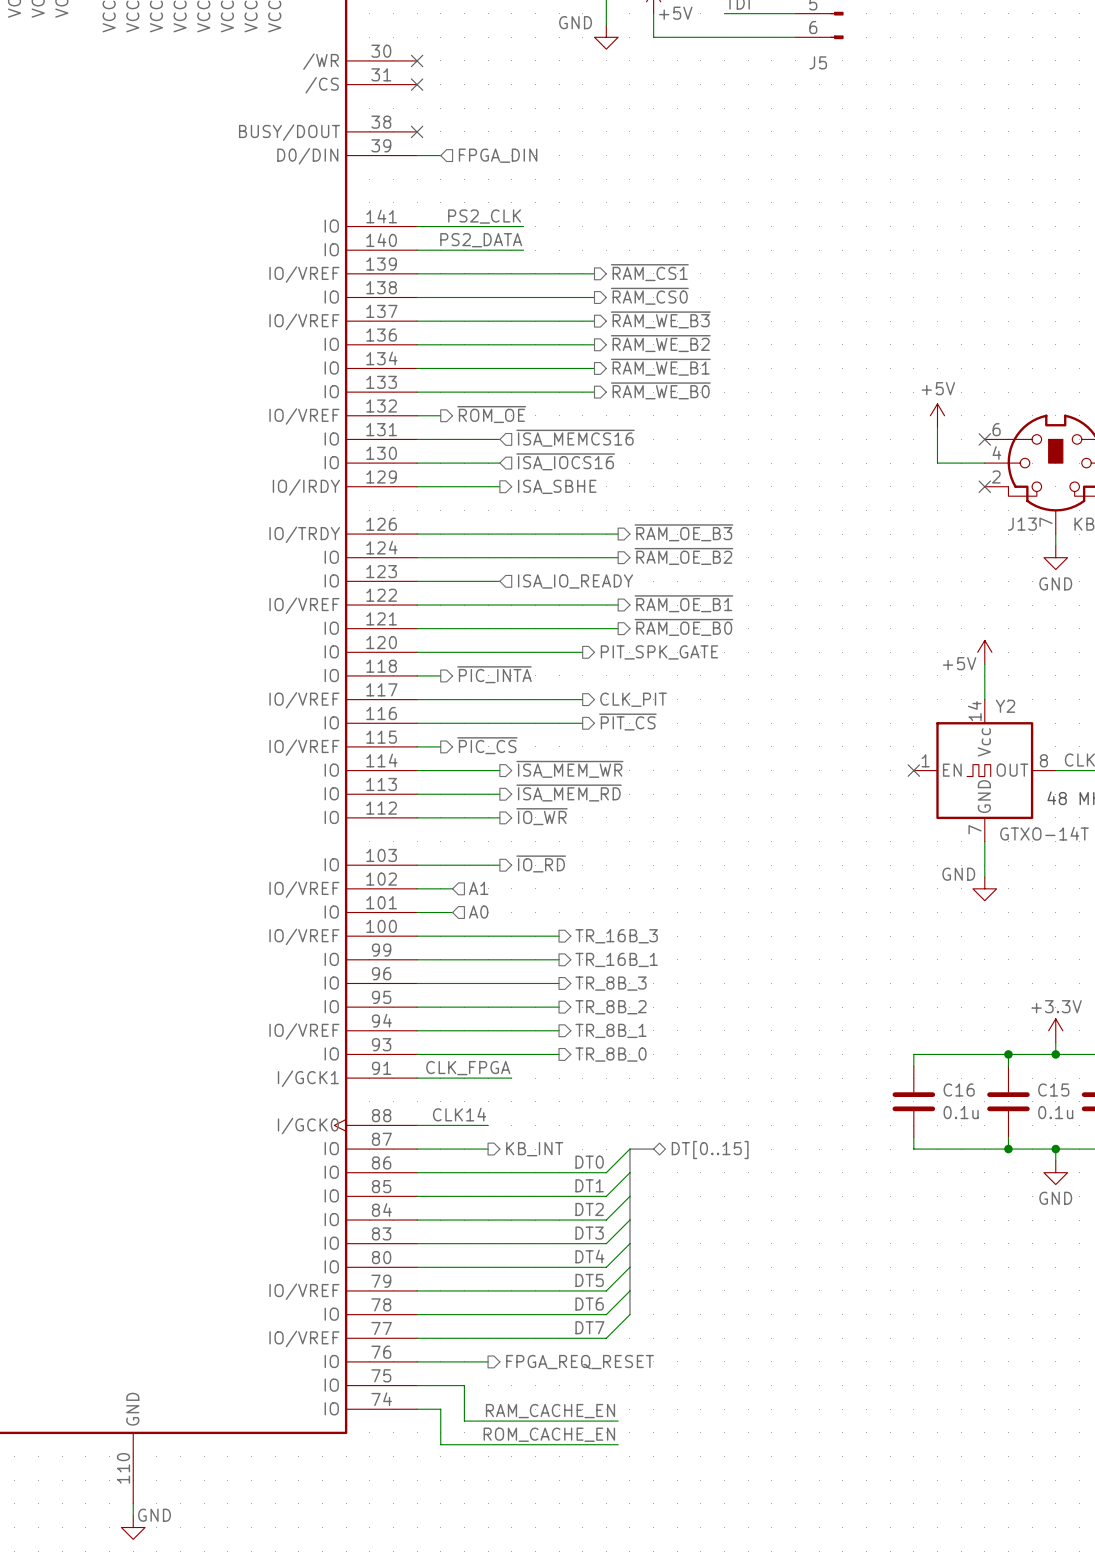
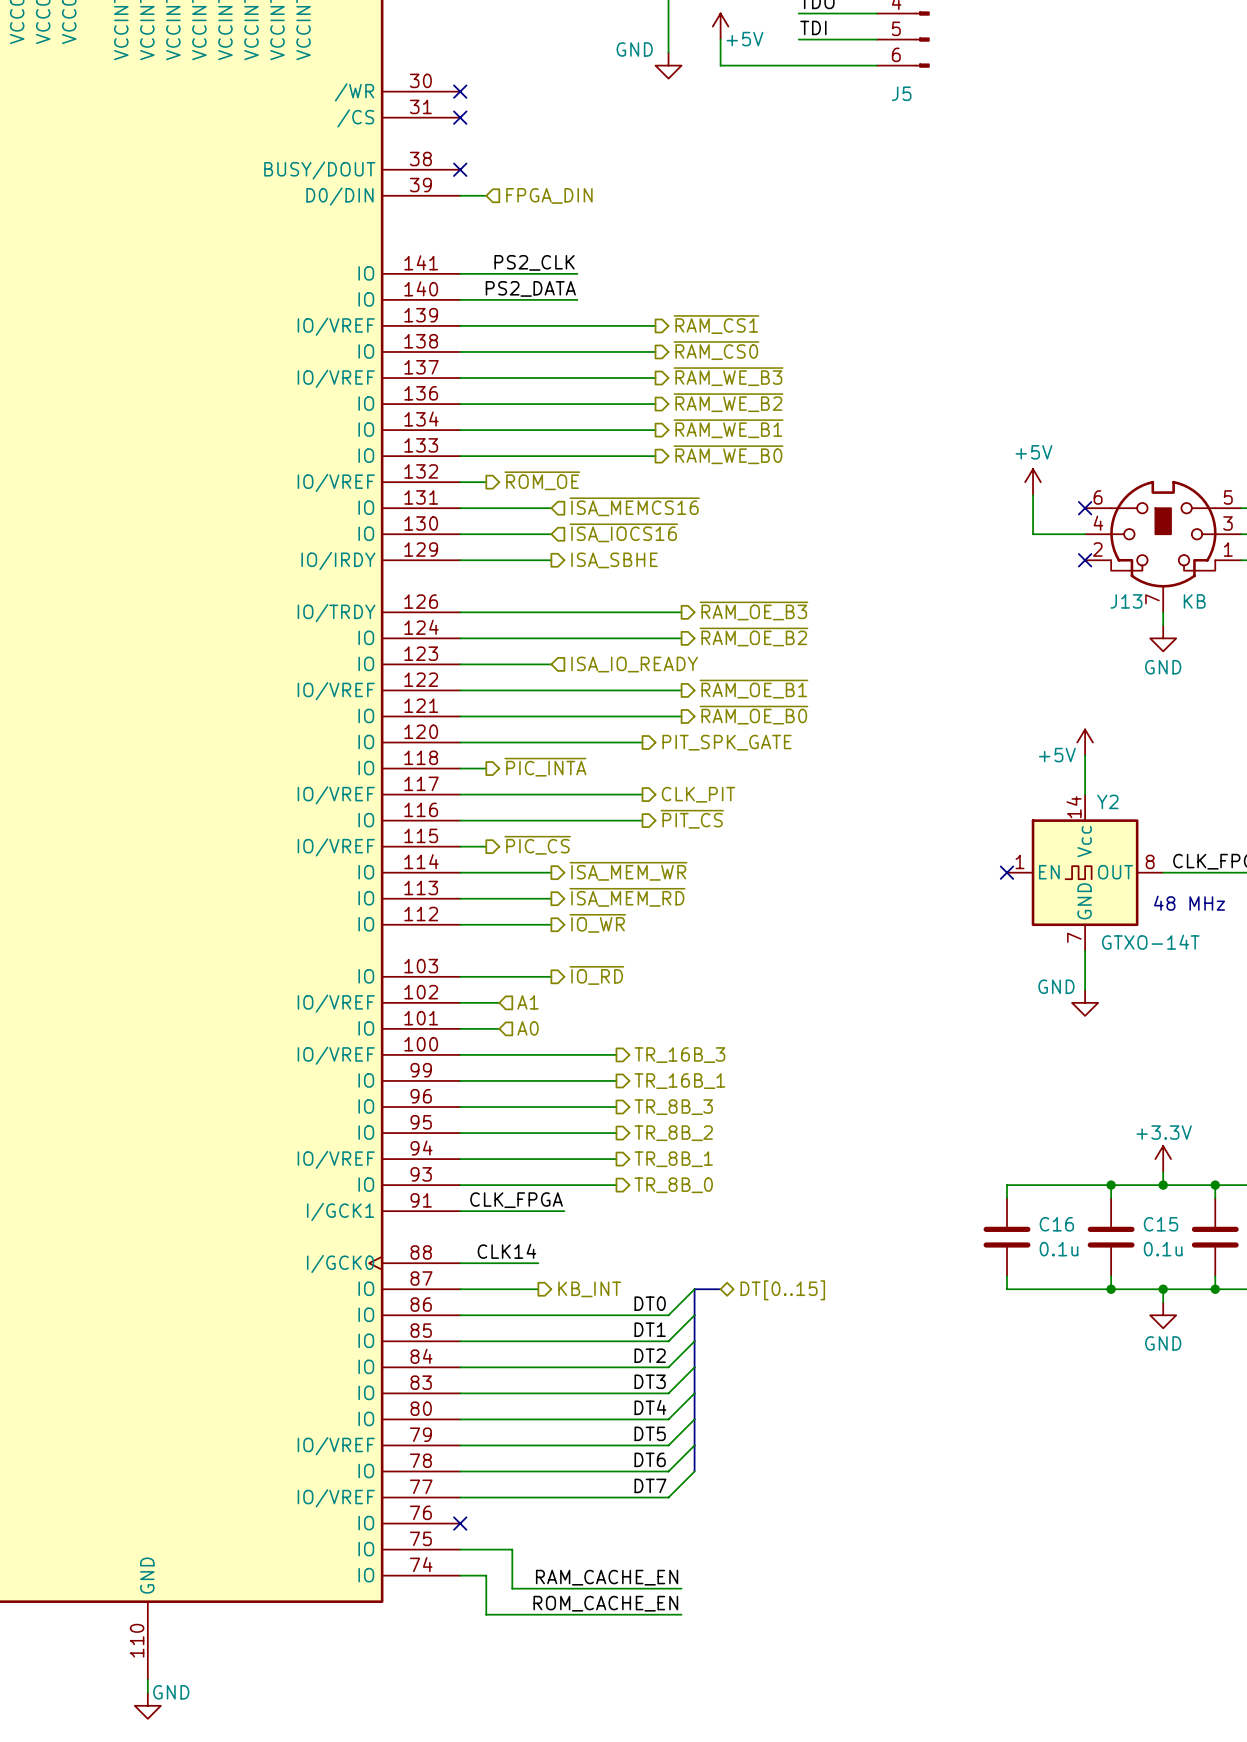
wire: (417, 1361) (488, 1361) -> none
no-connect mark: none -> (460, 1523)
hierarchical label: FPGA_REQ_RESET (580, 1362) -> none

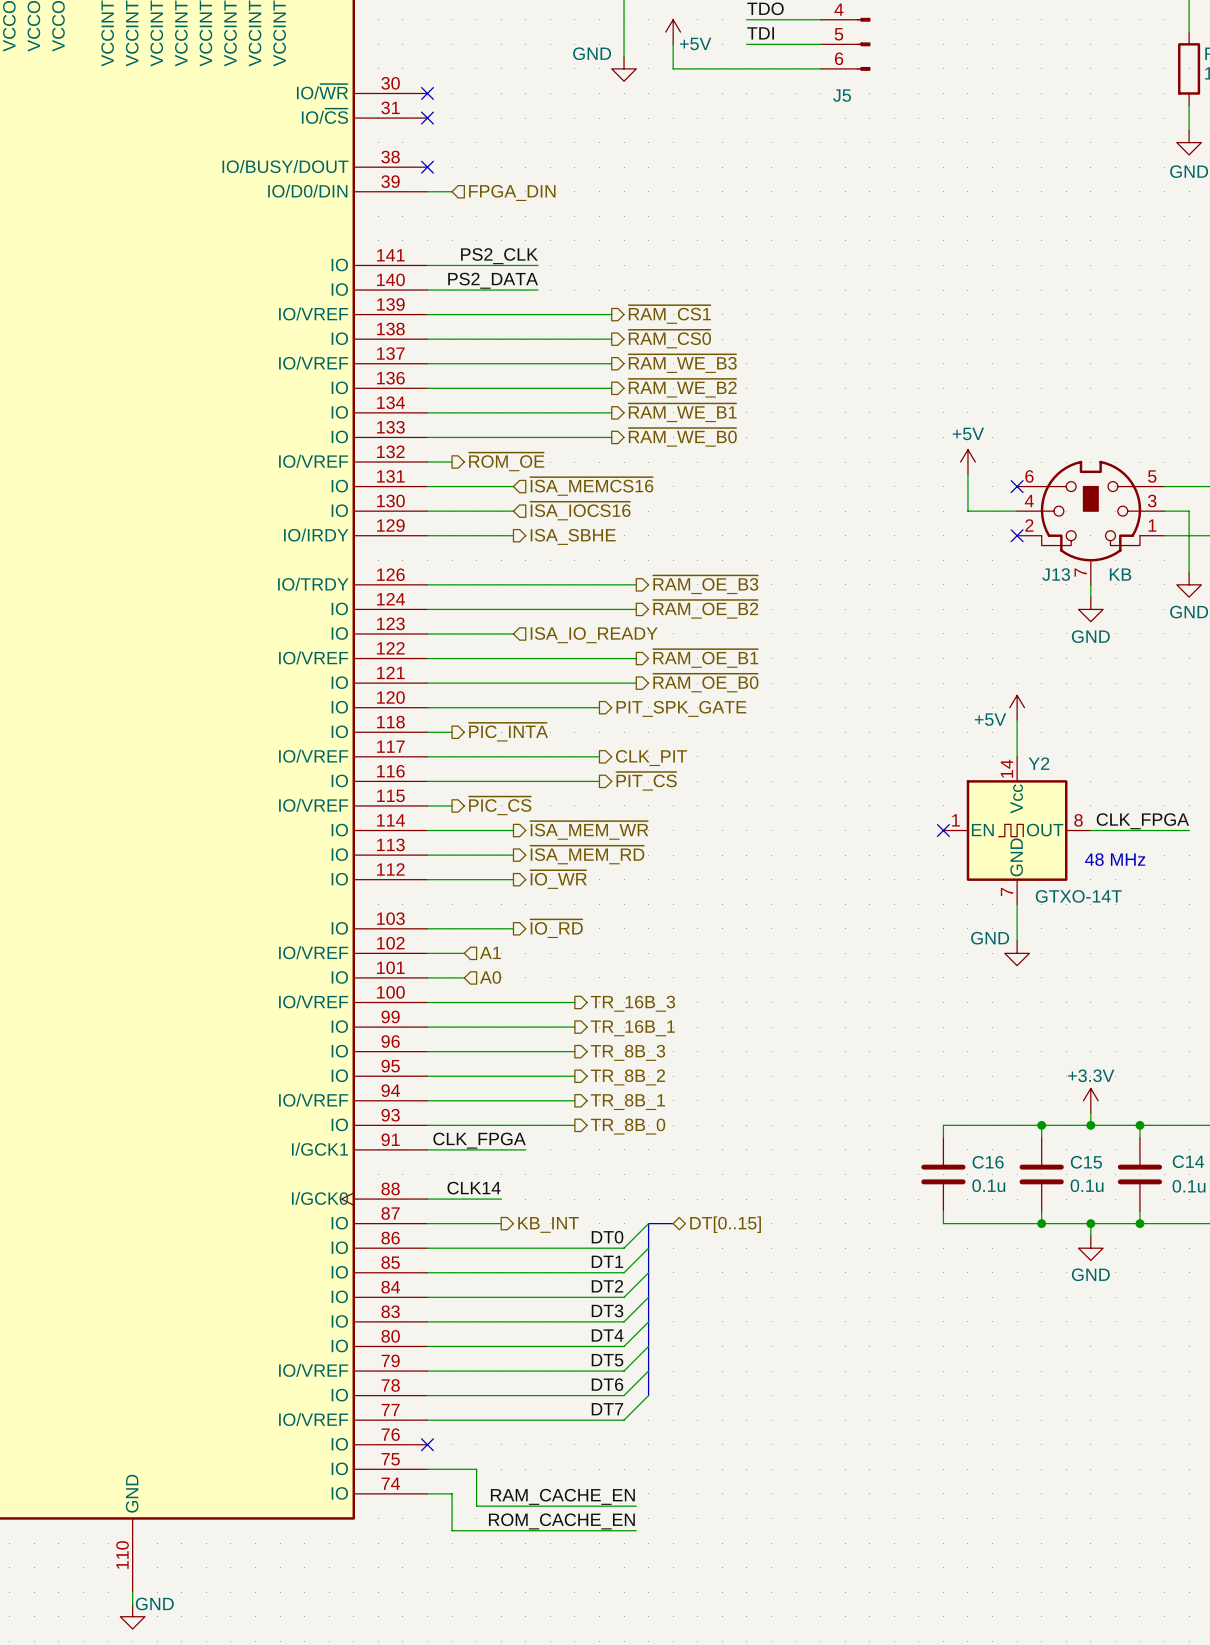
part pin name: /WR (354, 92) -> IO/~{WR} (322, 91)
part pin name: /CS (355, 118) -> IO/~{CS} (324, 116)
part pin name: BUSY/DOUT (319, 170) -> IO/BUSY/DOUT (285, 166)
part pin name: D0/DIN (339, 196) -> IO/D0/DIN (307, 191)

